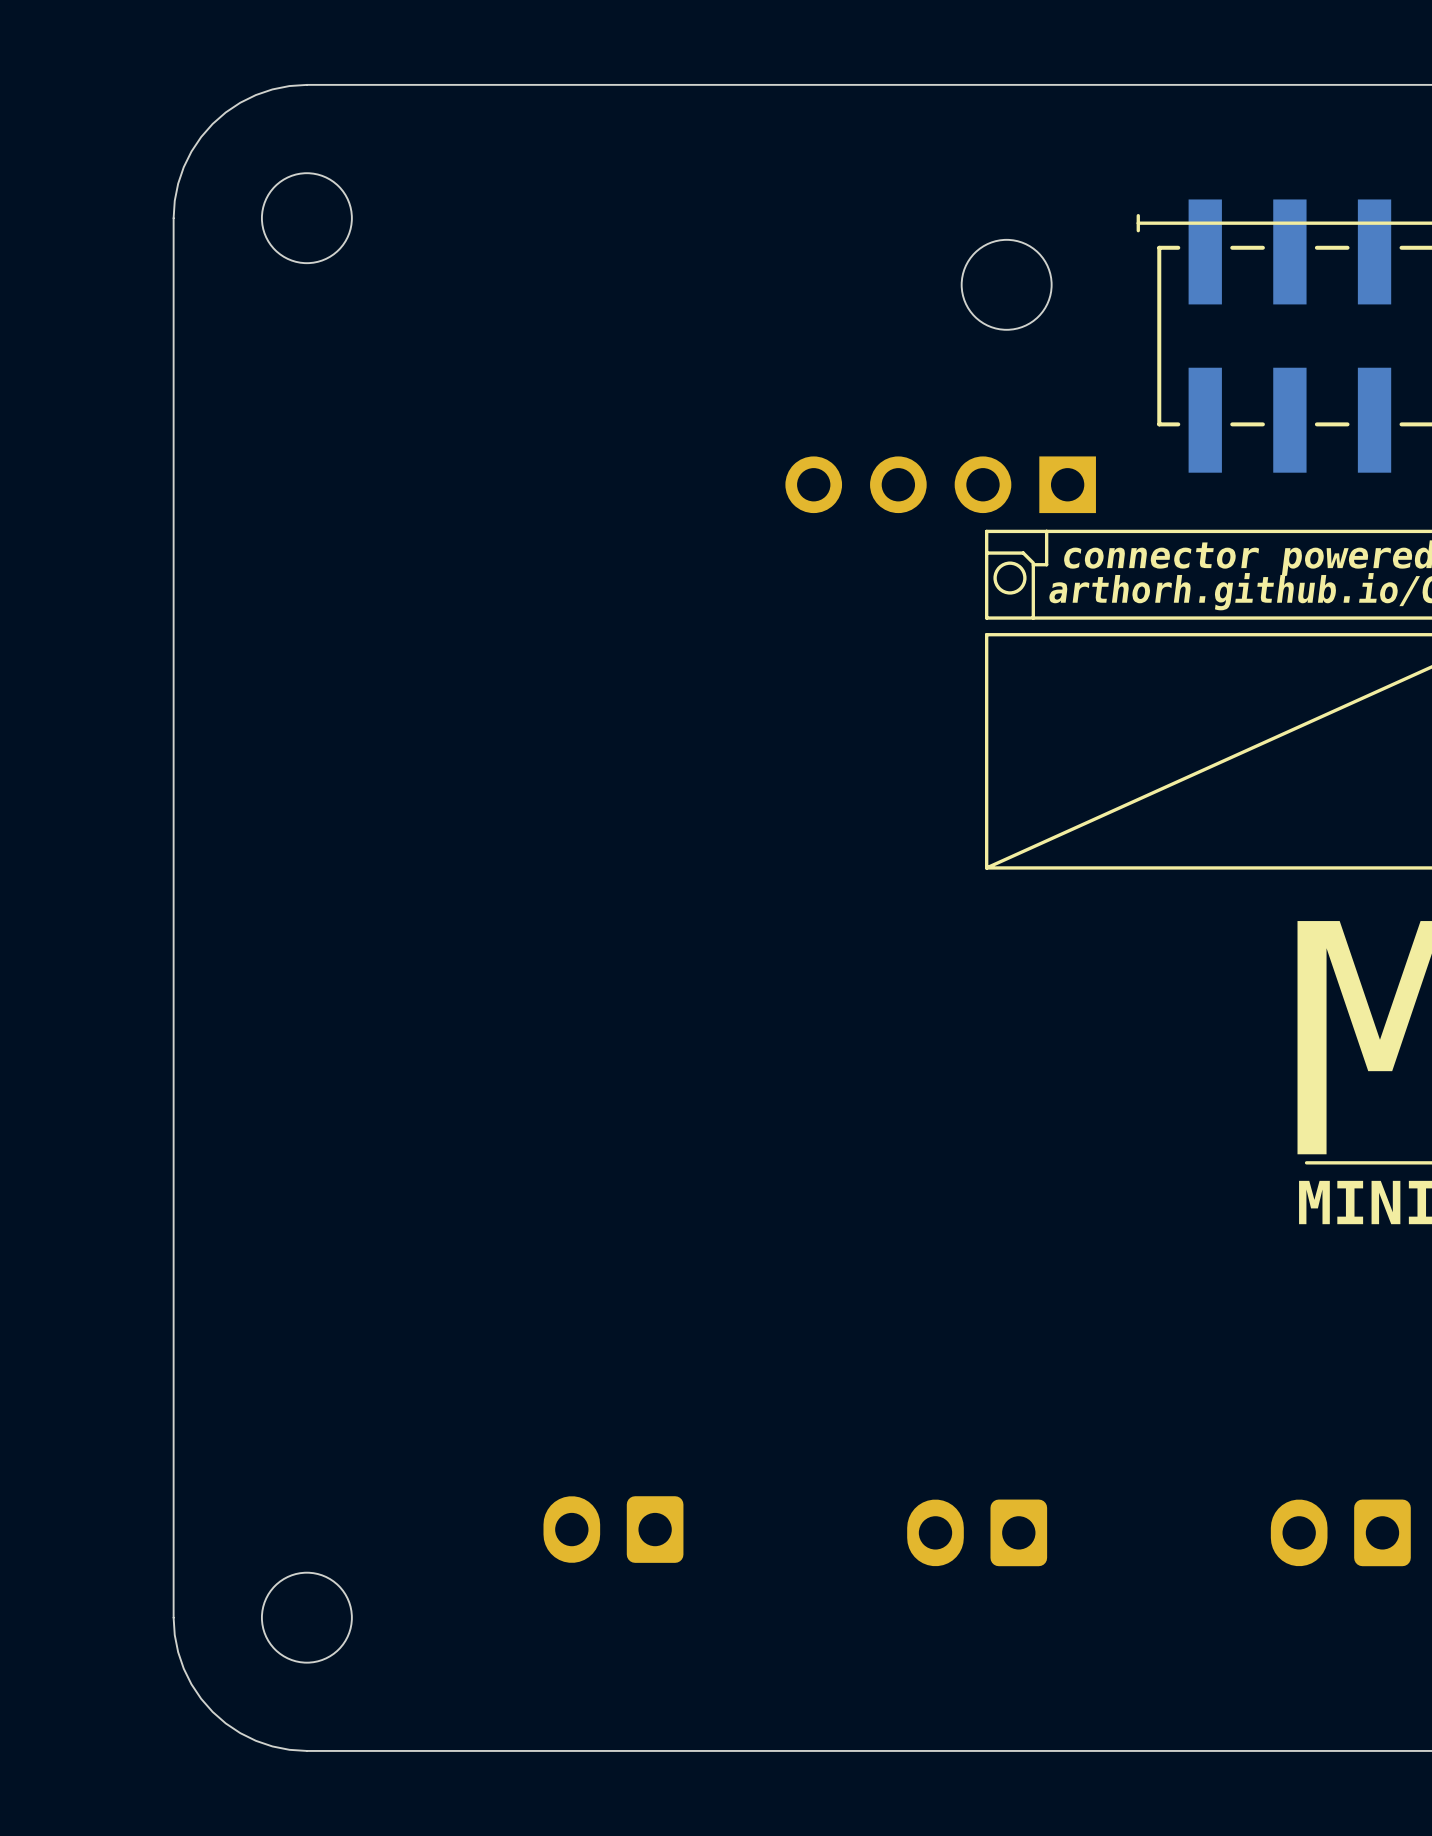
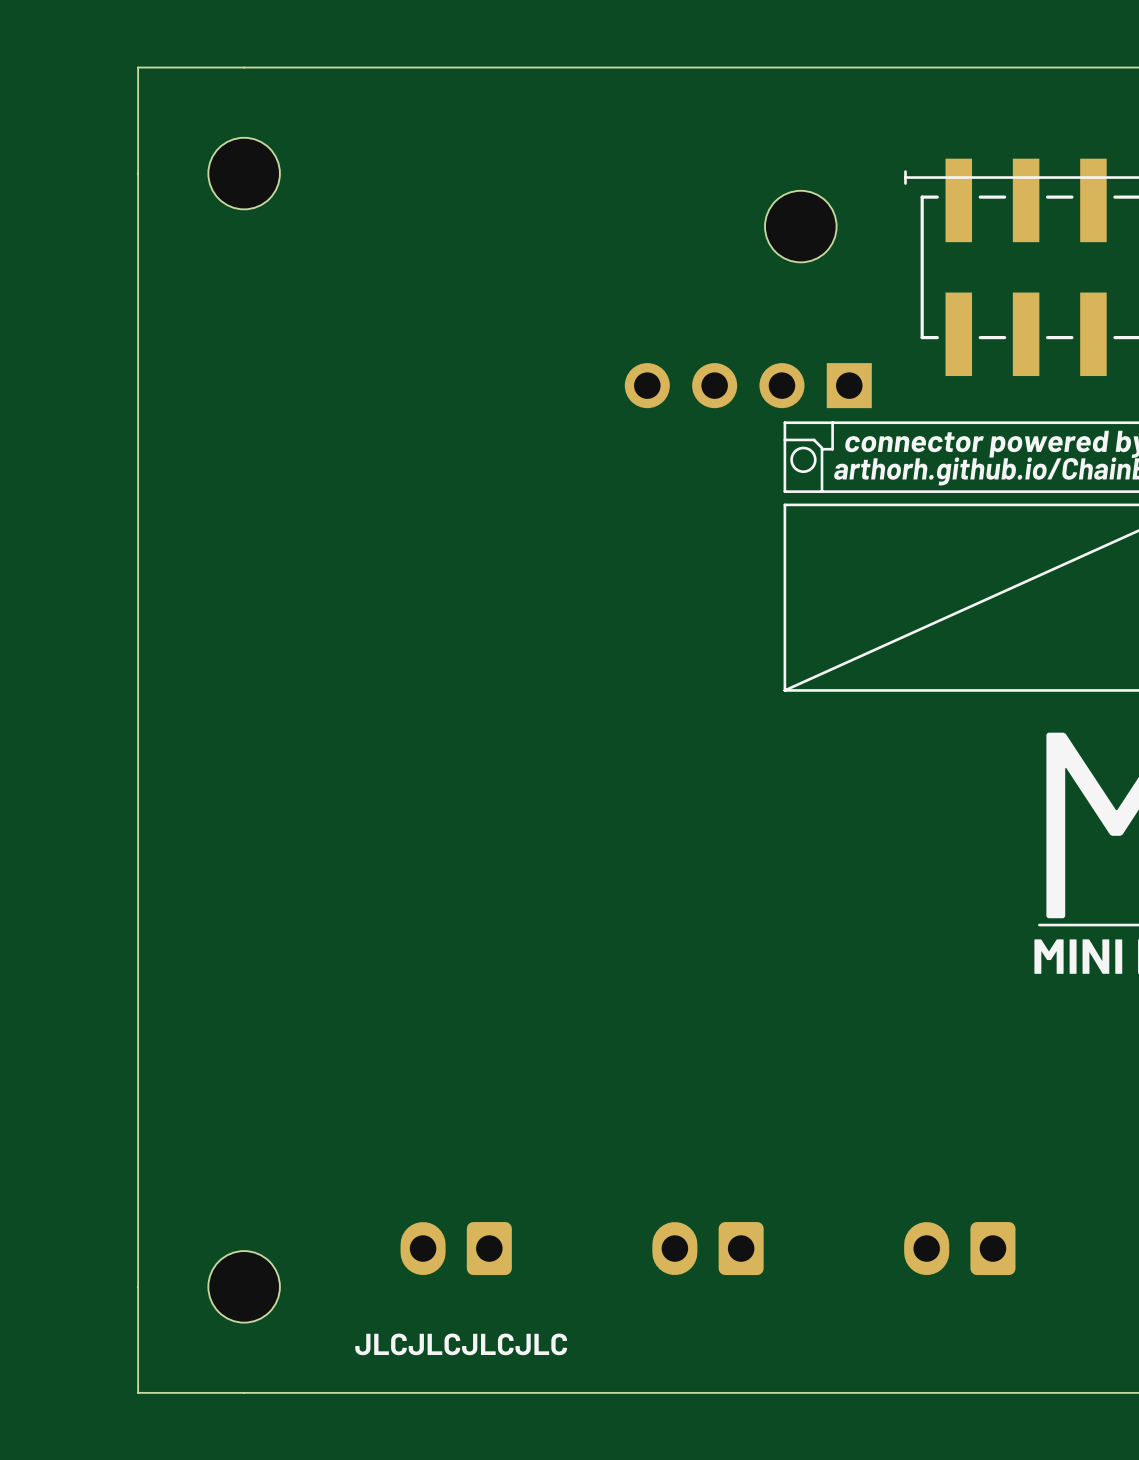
board edge: (306, 84) (289, 86) (255, 95) (225, 112) (212, 123) (201, 137) (183, 167) (174, 200) (173, 218) -> (244, 67) (138, 67) (138, 173)
part position: (613, 1529) -> (456, 1248)
part position: (977, 1532) -> (708, 1248)
part: (1340, 1532) -> none
part: none -> (959, 1248)
board edge: (173, 1617) (178, 1652) (183, 1668) (191, 1684) (212, 1711) (225, 1723) (255, 1740) (272, 1746) (306, 1750) -> (138, 1286) (138, 1392) (244, 1392)
drawing: none -> [355, 1333, 568, 1356]

